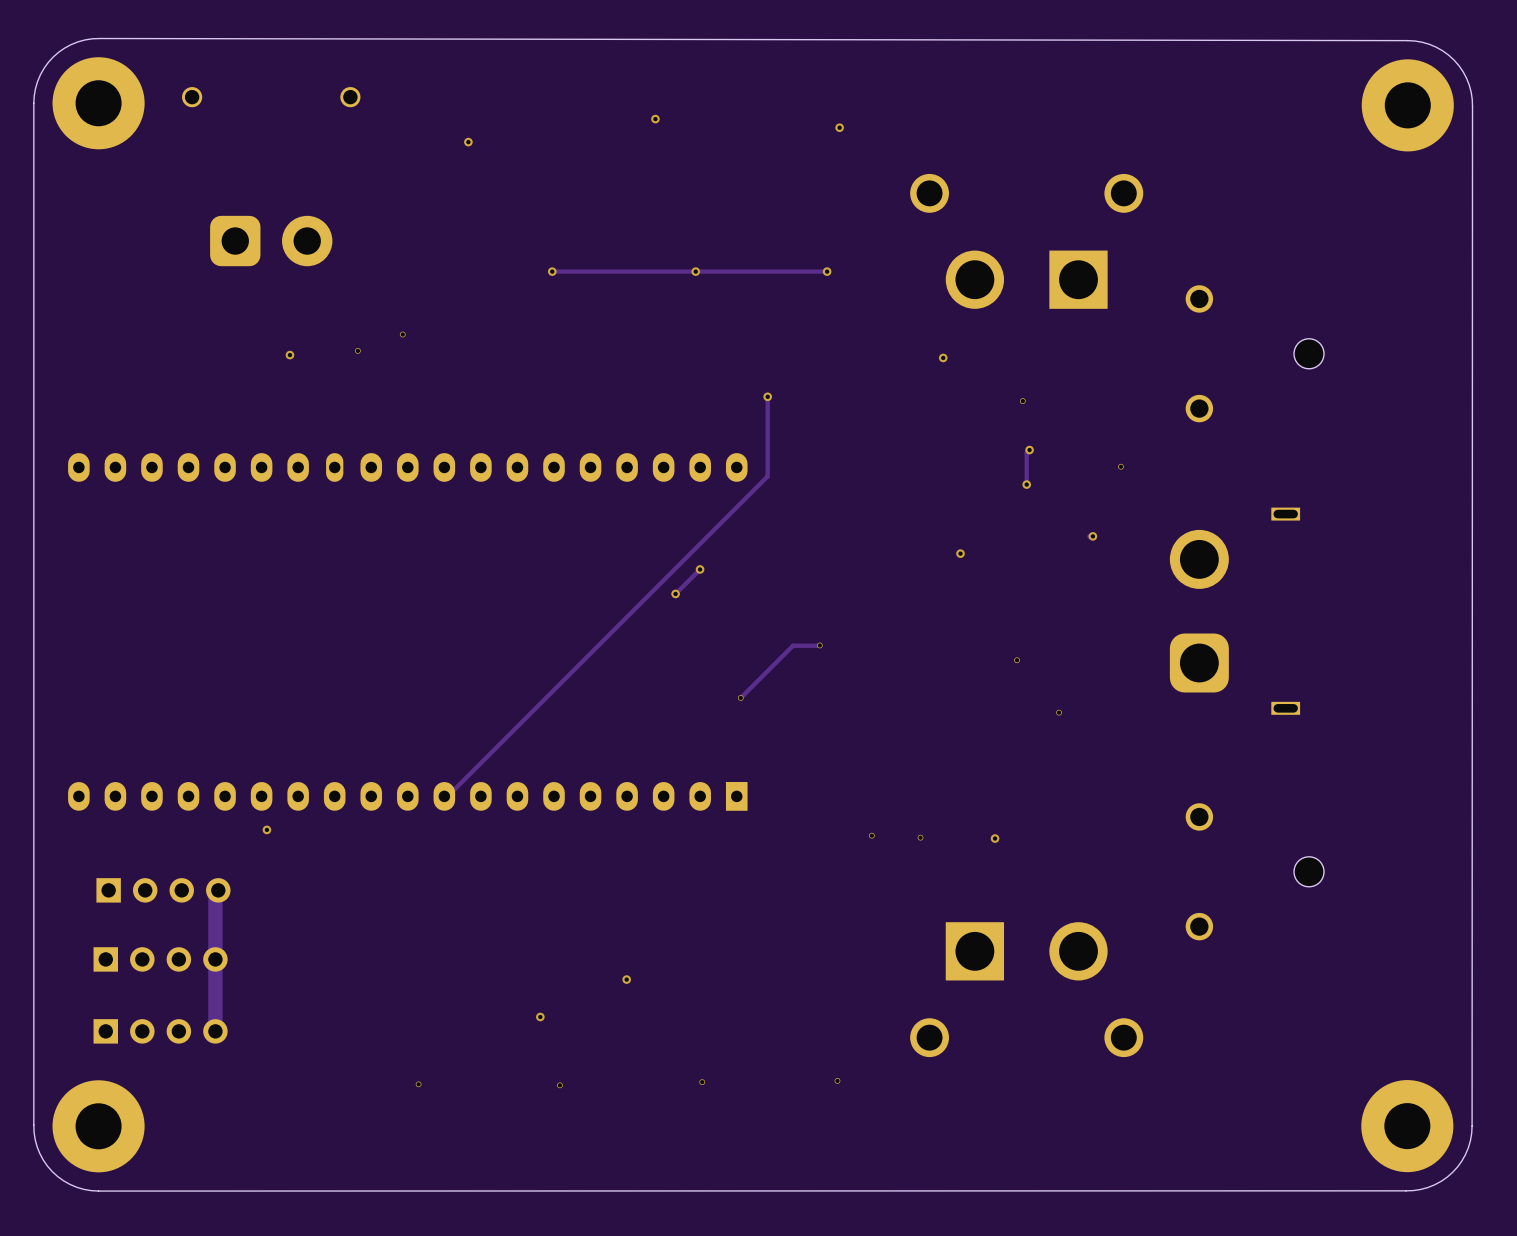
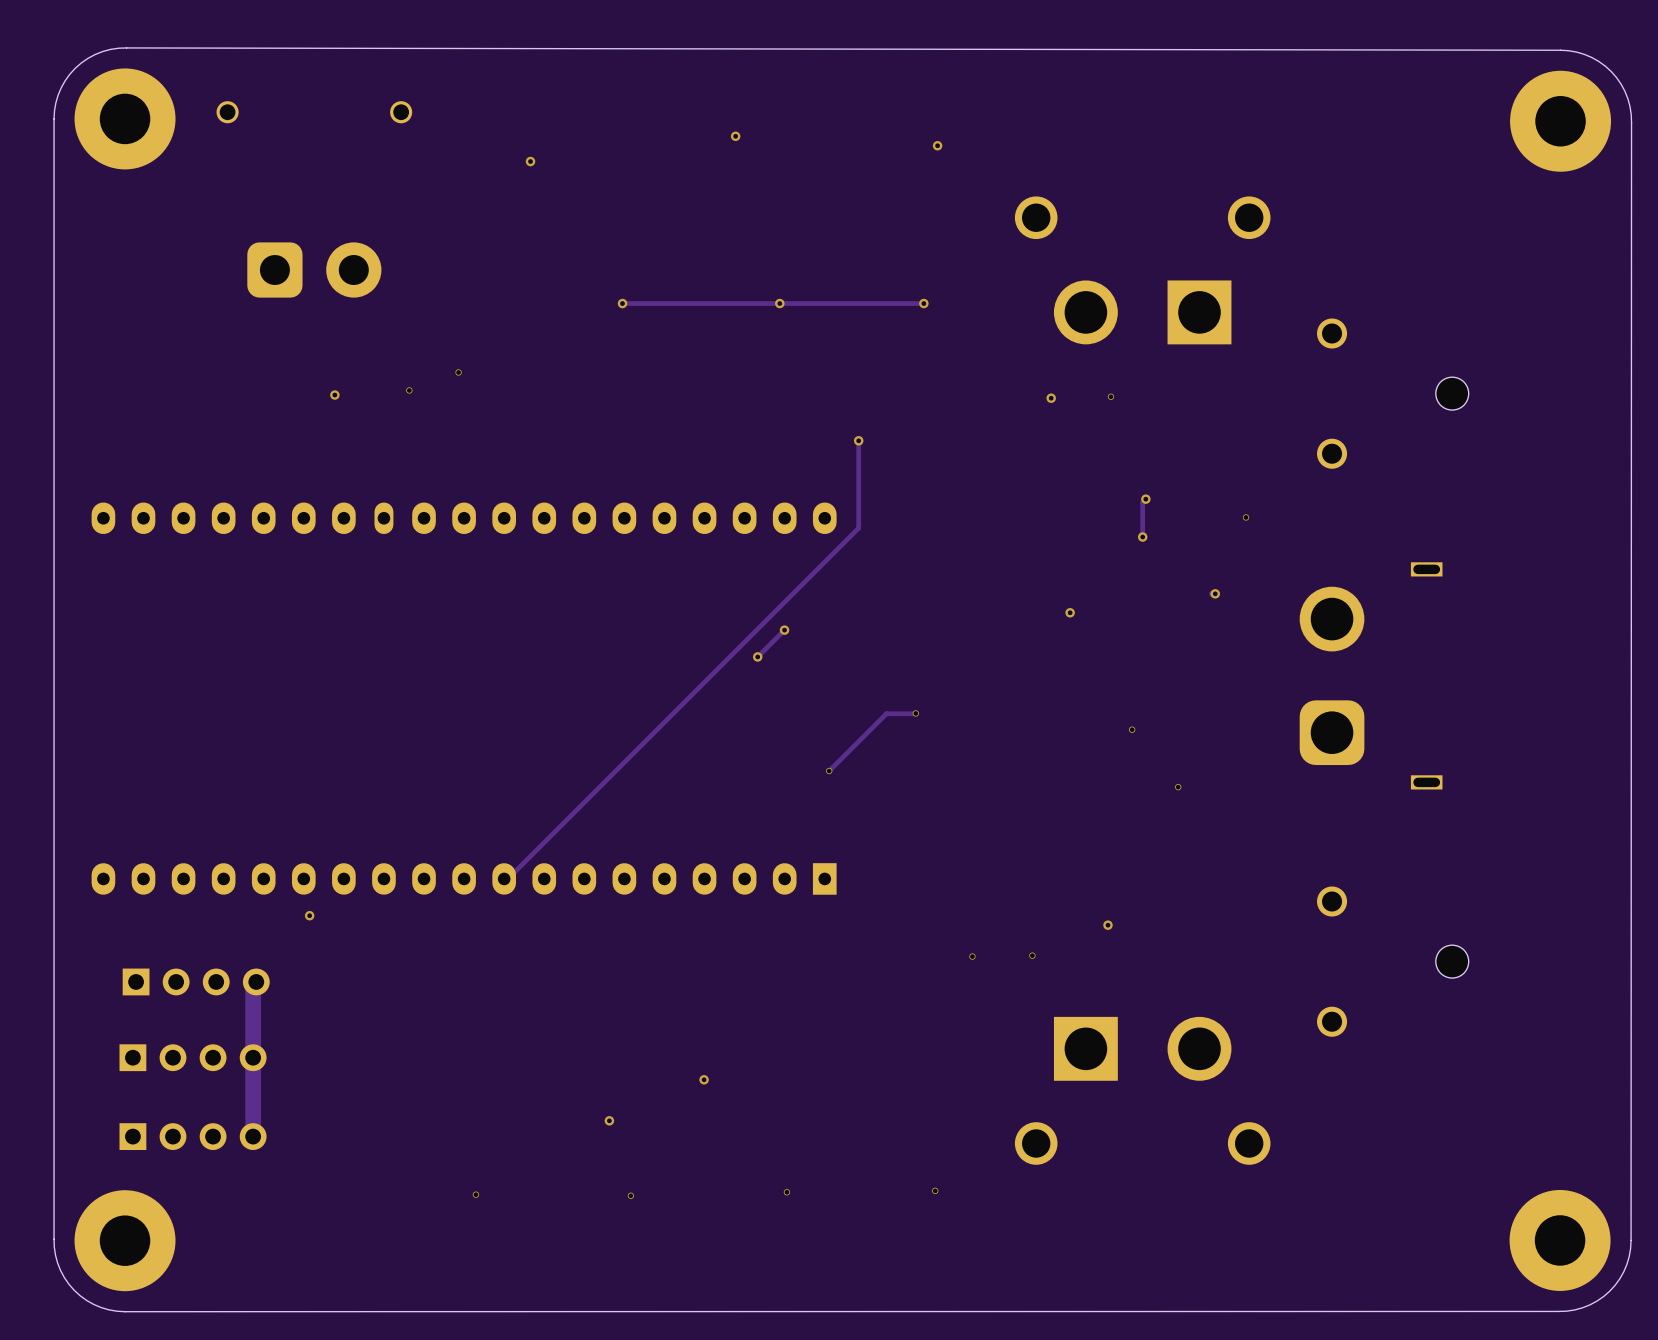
via position: (1022, 401) -> (1110, 396)
via: (871, 835) -> none
via: (920, 837) -> none
via: none -> (1032, 955)
via: none -> (972, 956)

